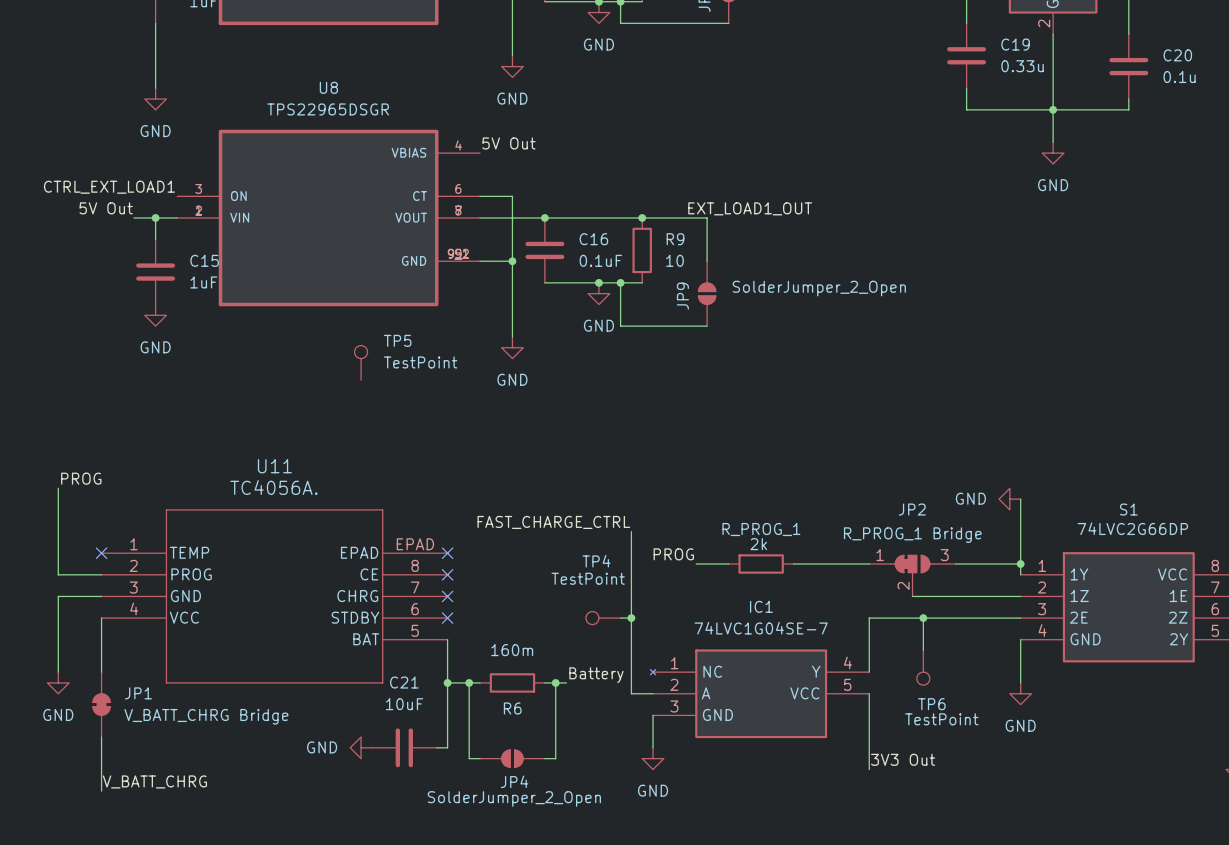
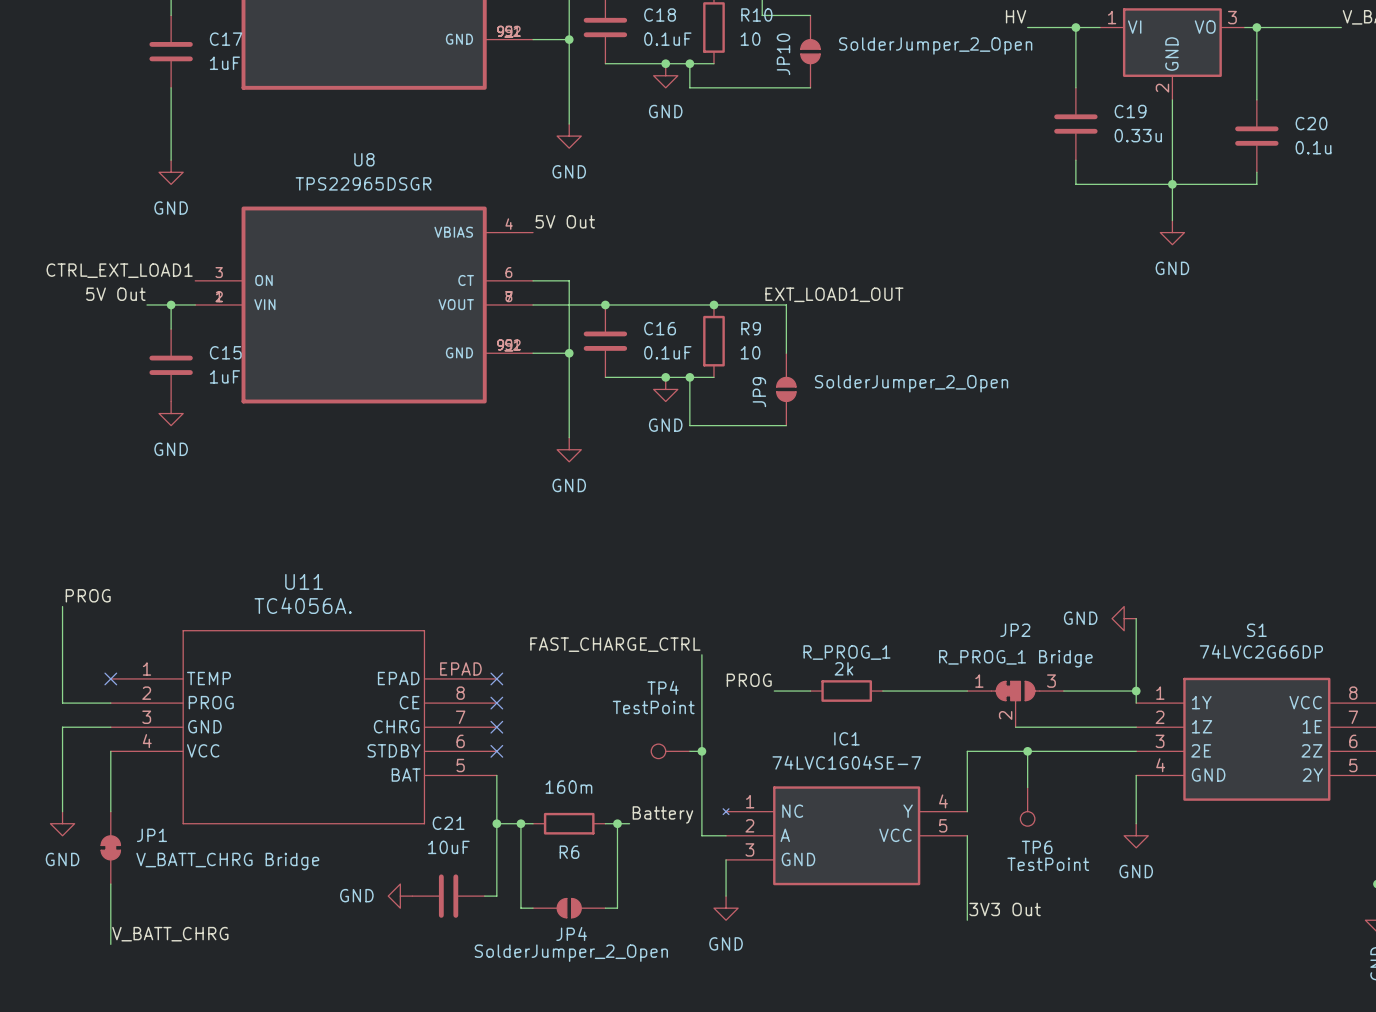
TP5: TestPoint (361, 362) -> none

